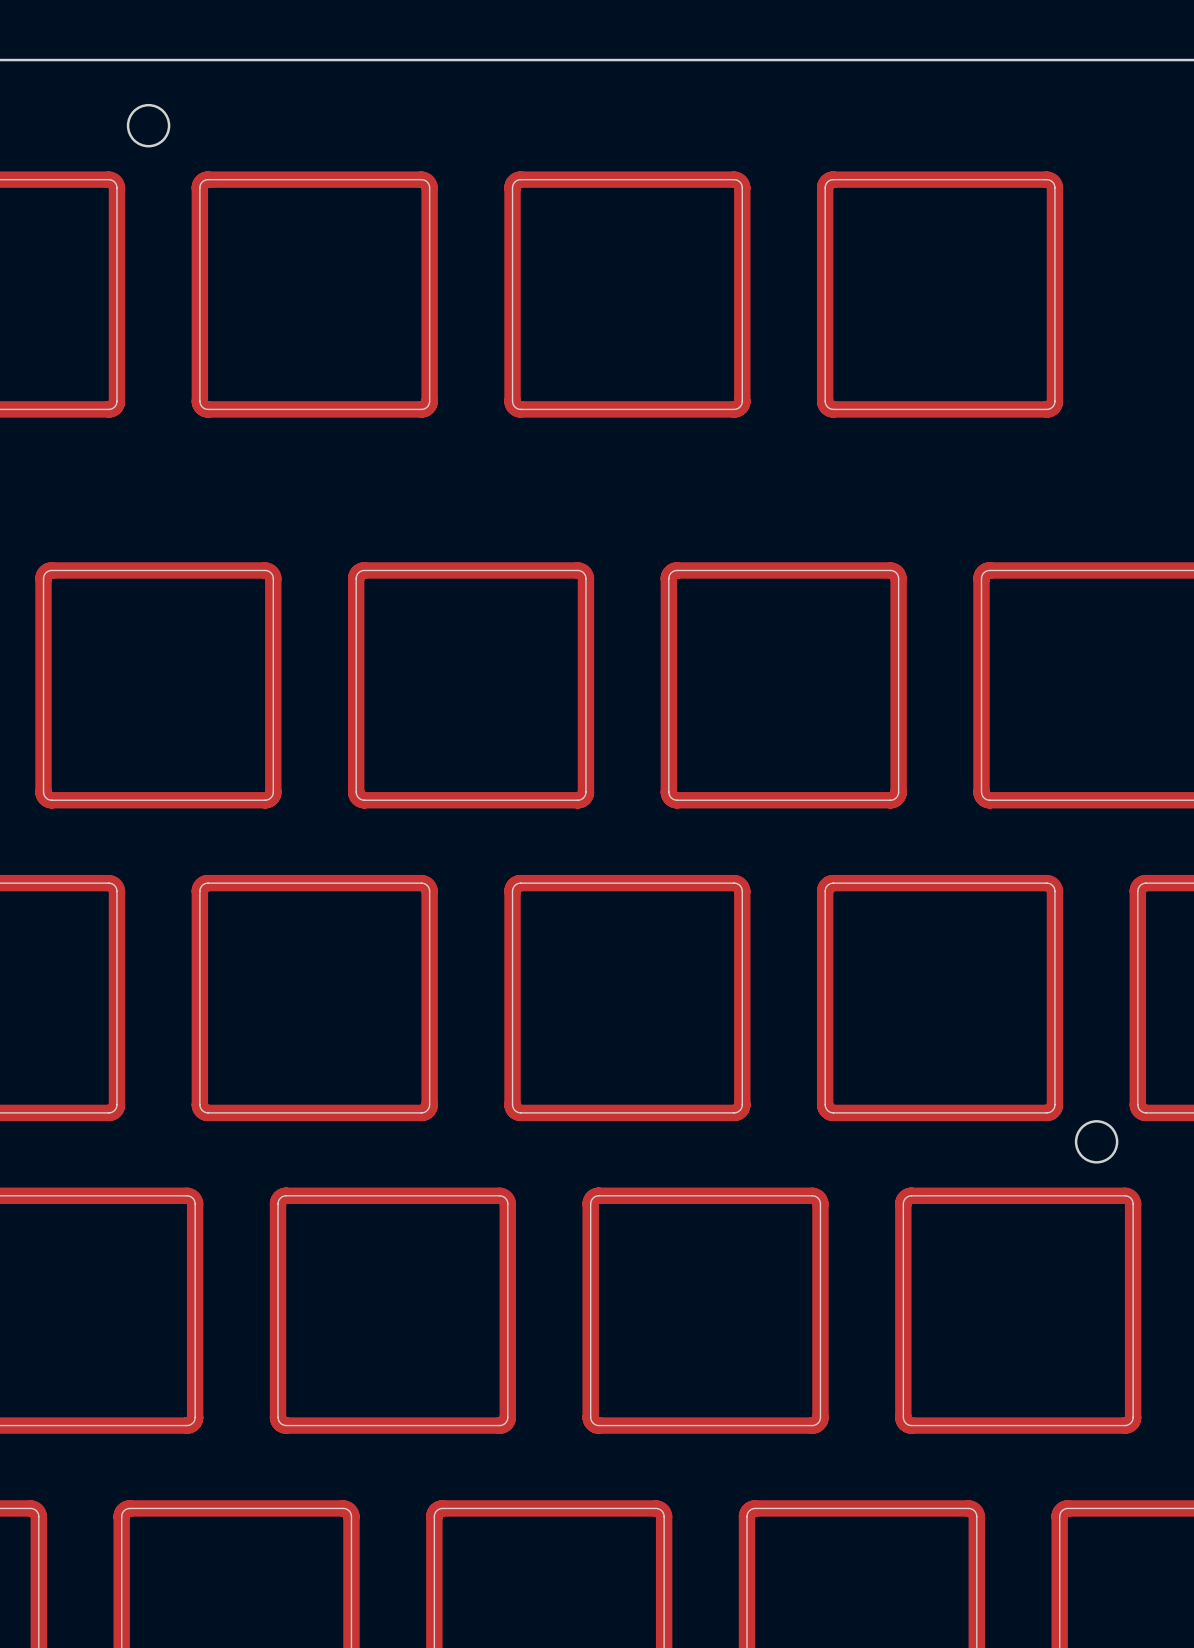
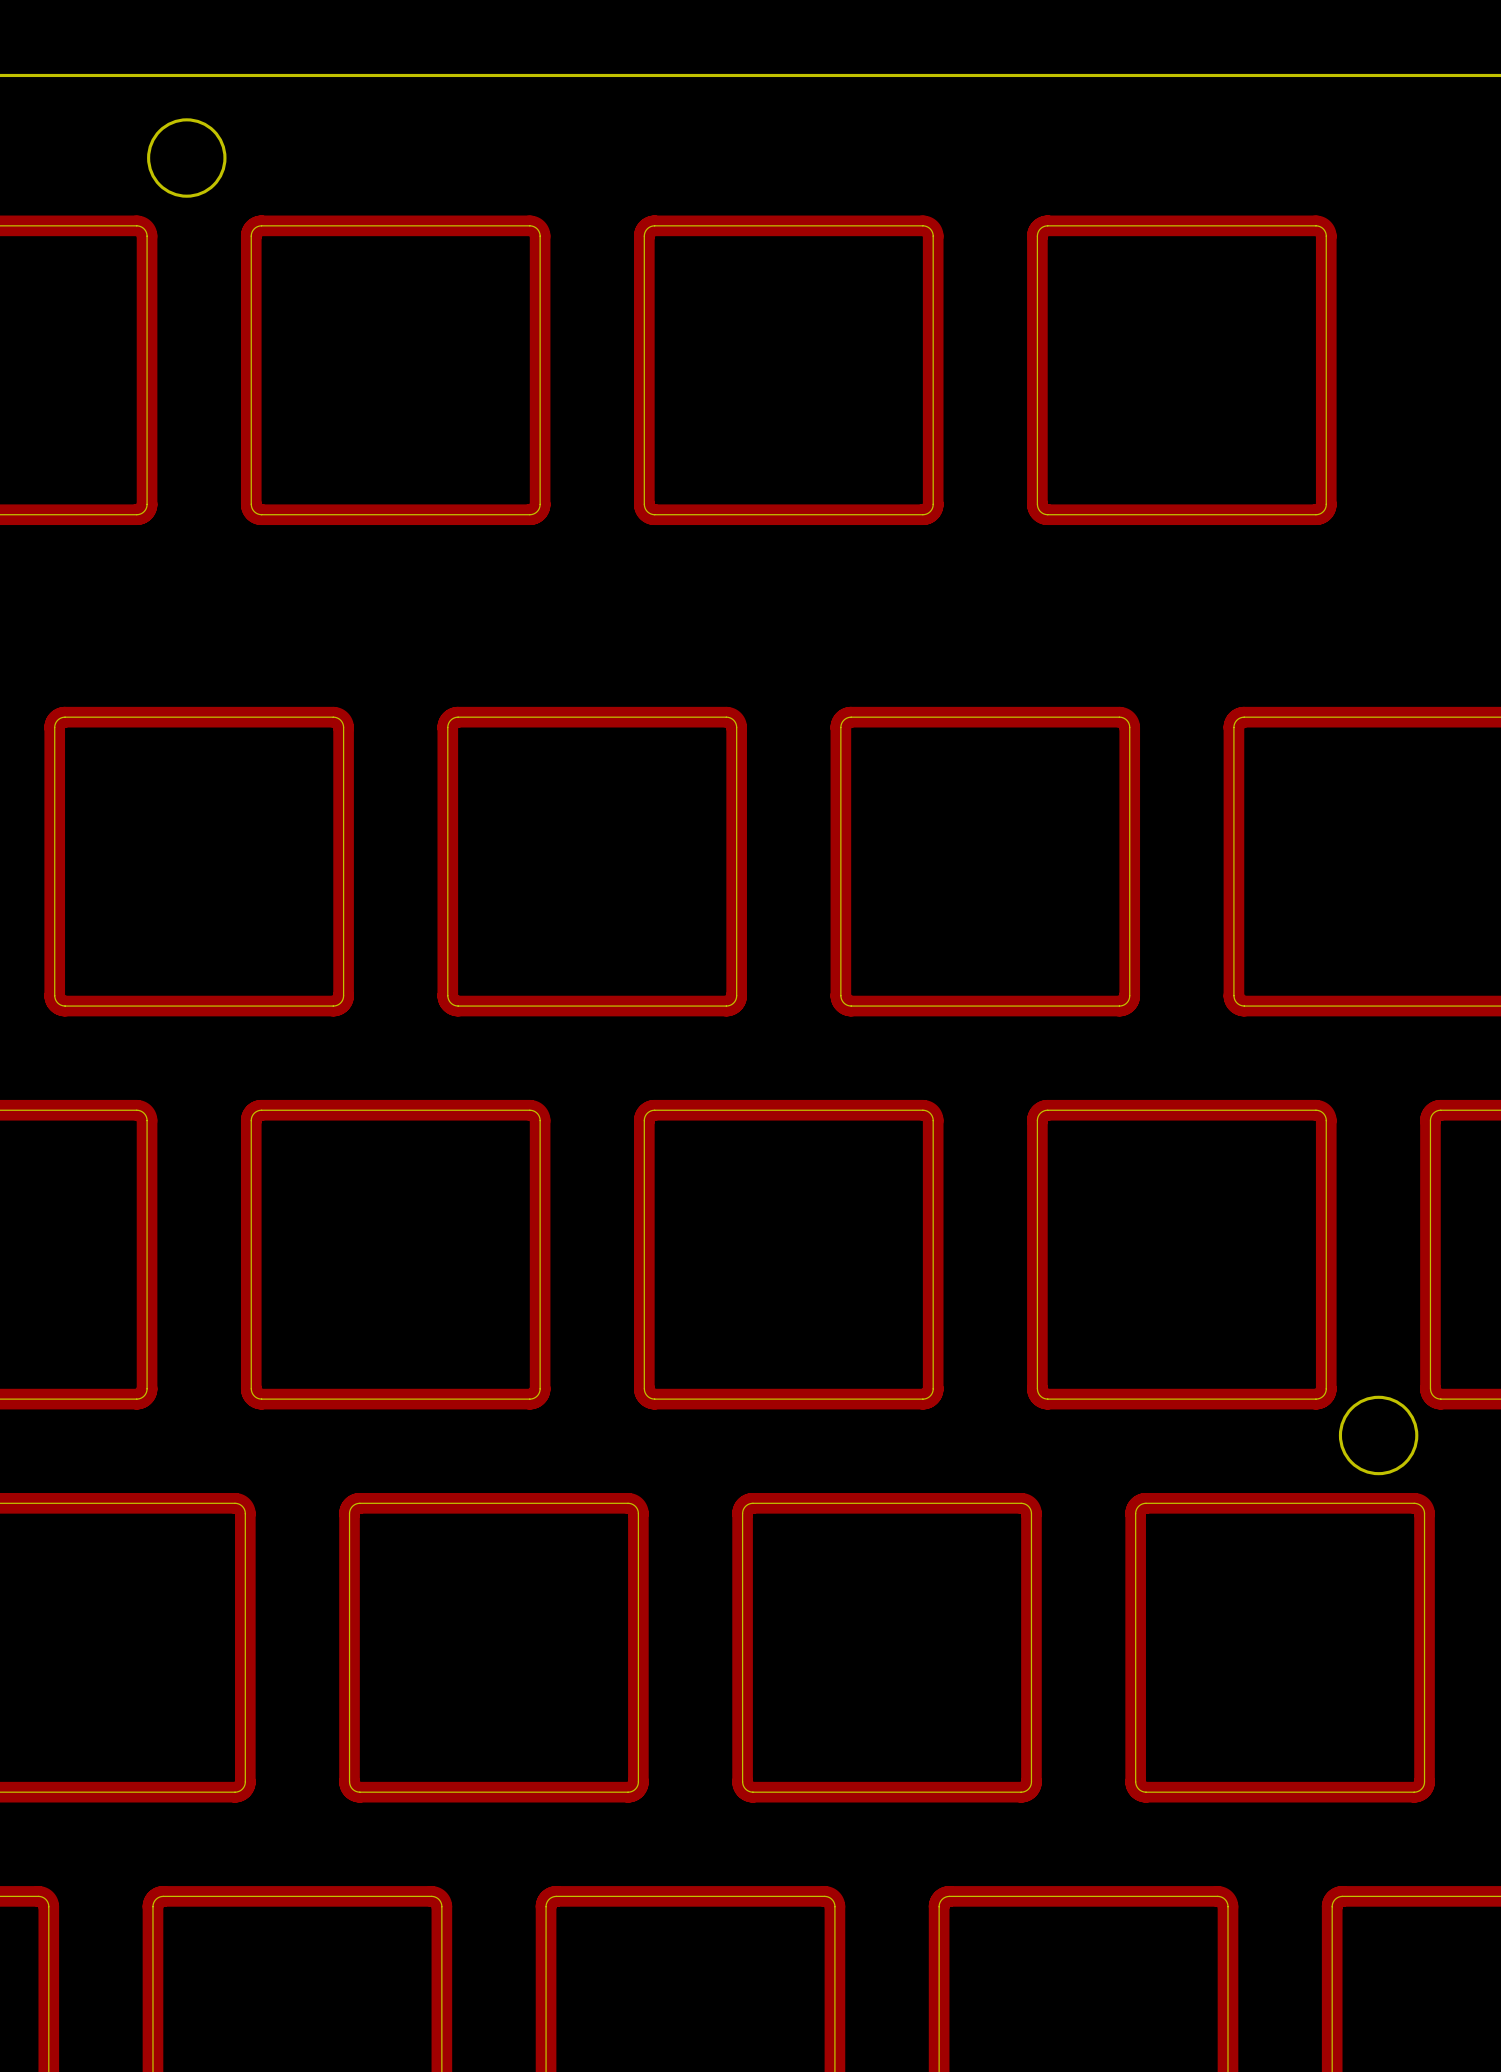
round board edge size: [126, 103, 171, 148] -> [147, 118, 227, 198]
round board edge size: [1074, 1120, 1119, 1164] -> [1338, 1395, 1419, 1476]

